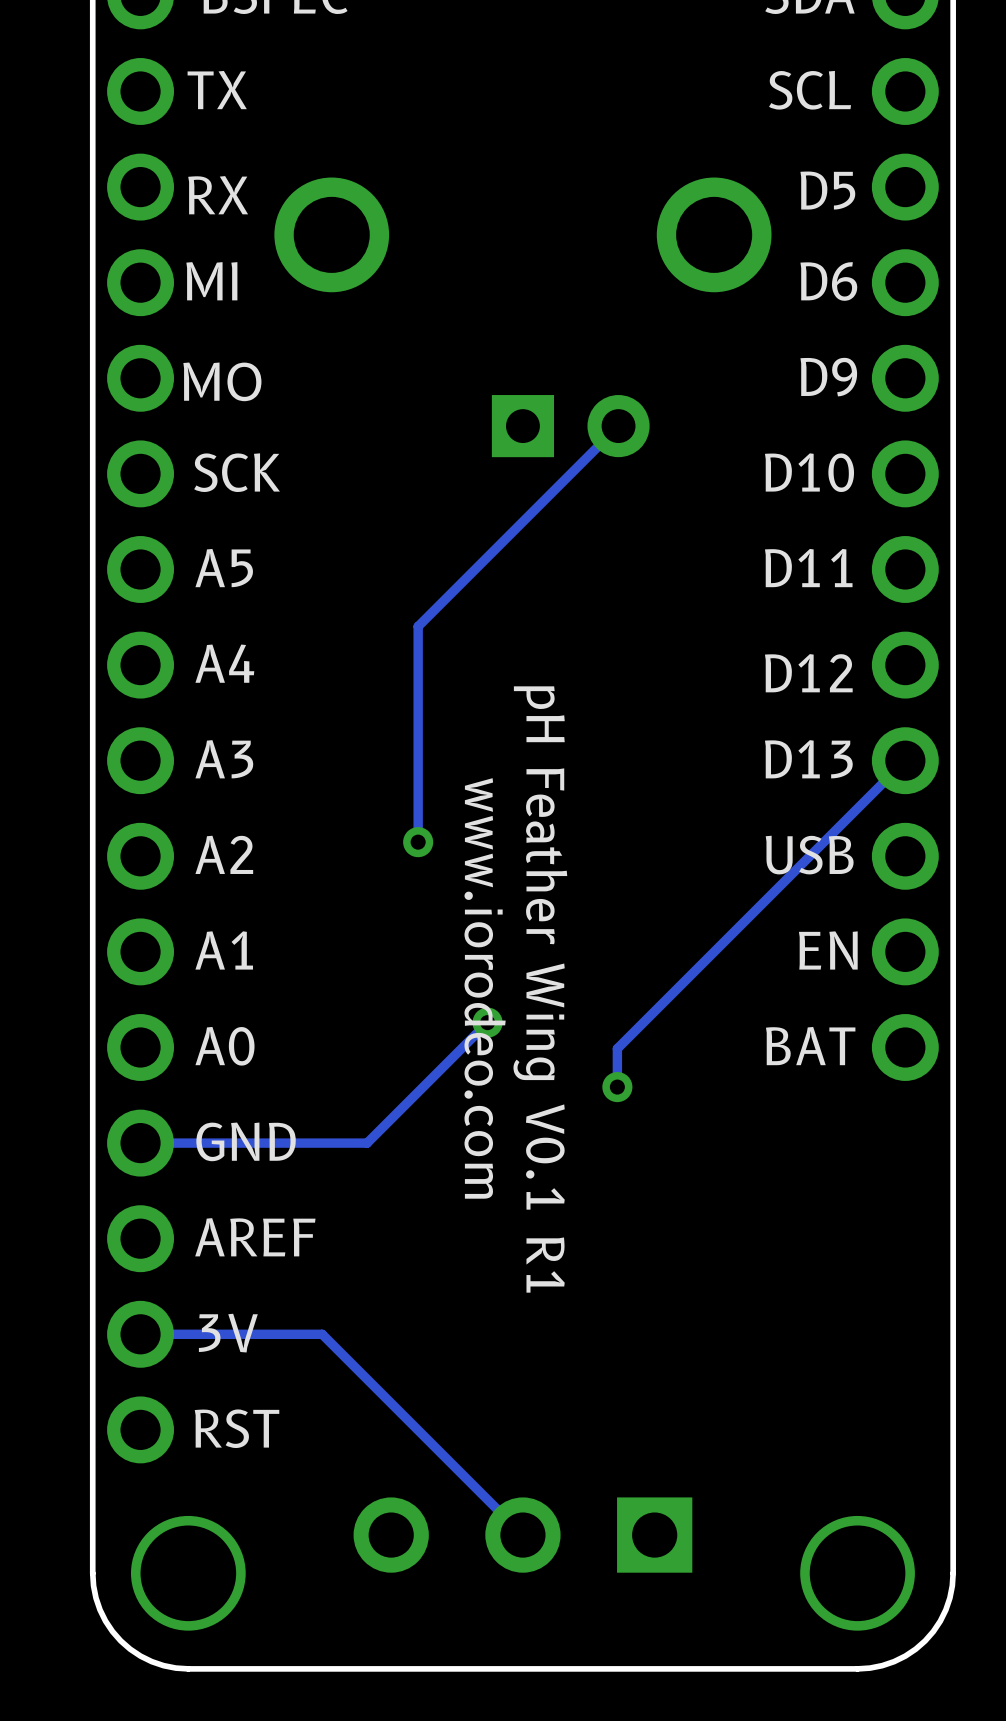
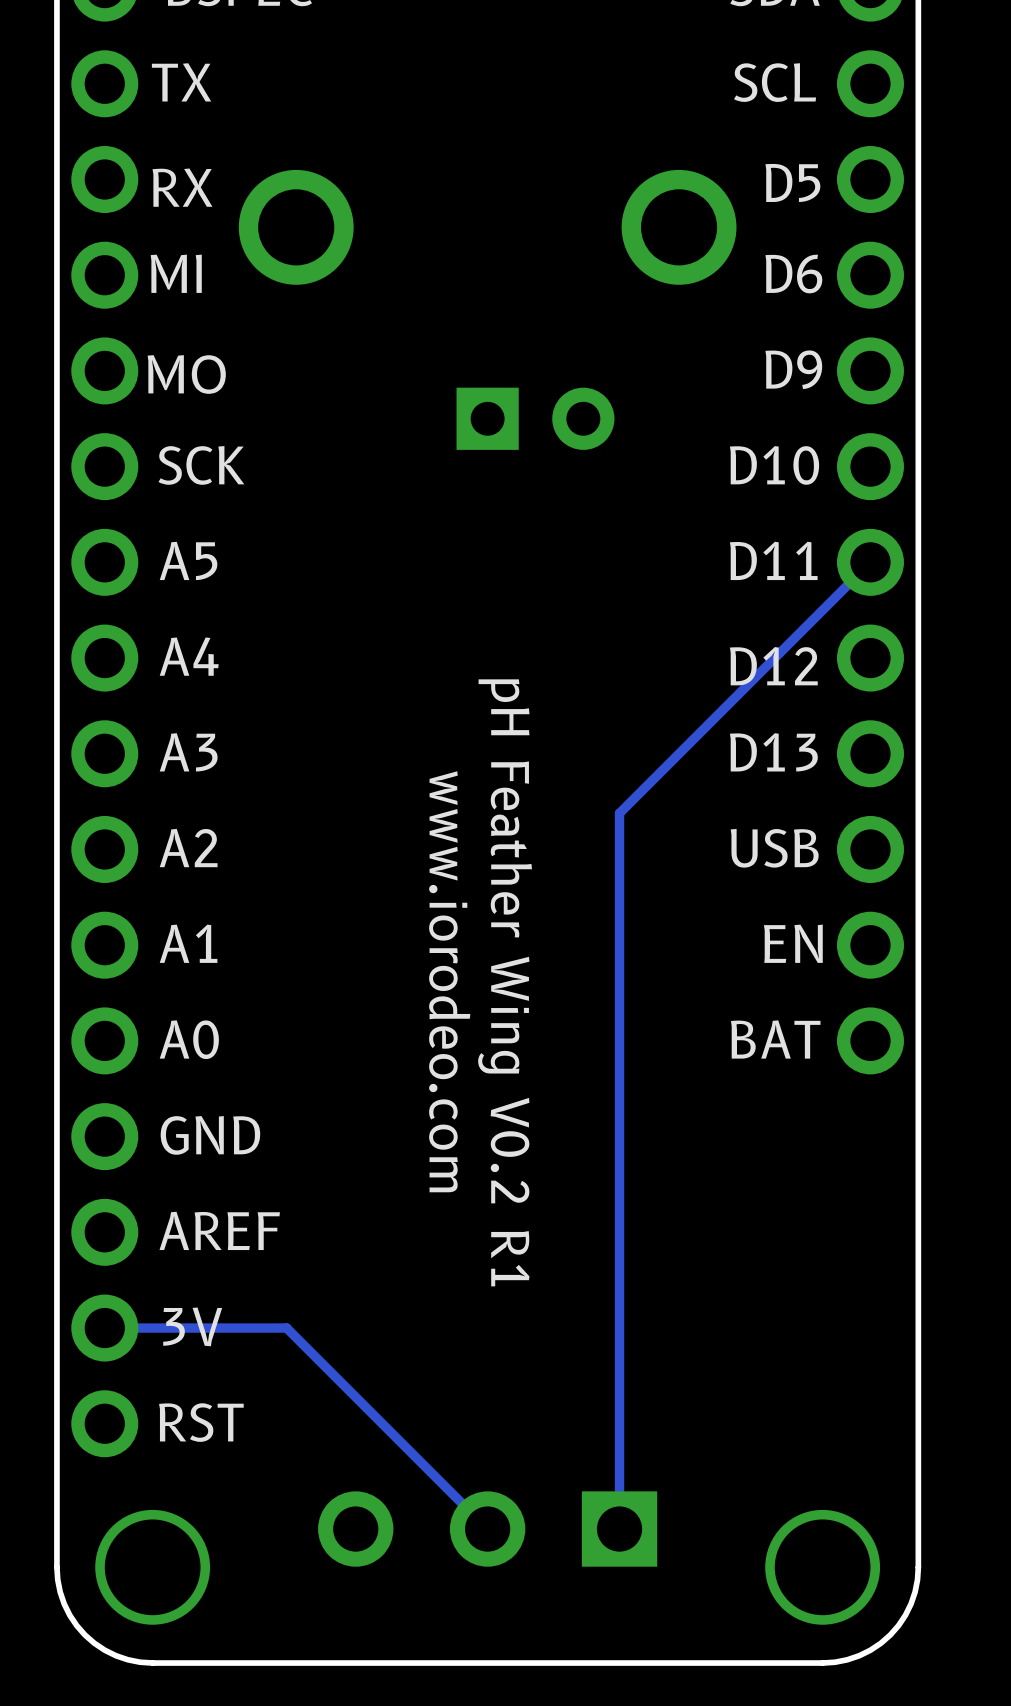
track: (618, 426) (418, 626) (418, 842) -> none
track: none -> (870, 562) (619, 813) (619, 1529)
track: (905, 760) (617, 1048) (617, 1087) -> none
via: (418, 842) -> none
text: pH Feather Wing V0.1 R1 (540, 989) -> pH Feather Wing V0.2 R1 (505, 982)
track: (487, 1022) (367, 1143) (140, 1143) -> none
via: (487, 1022) -> none
via: (617, 1087) -> none

